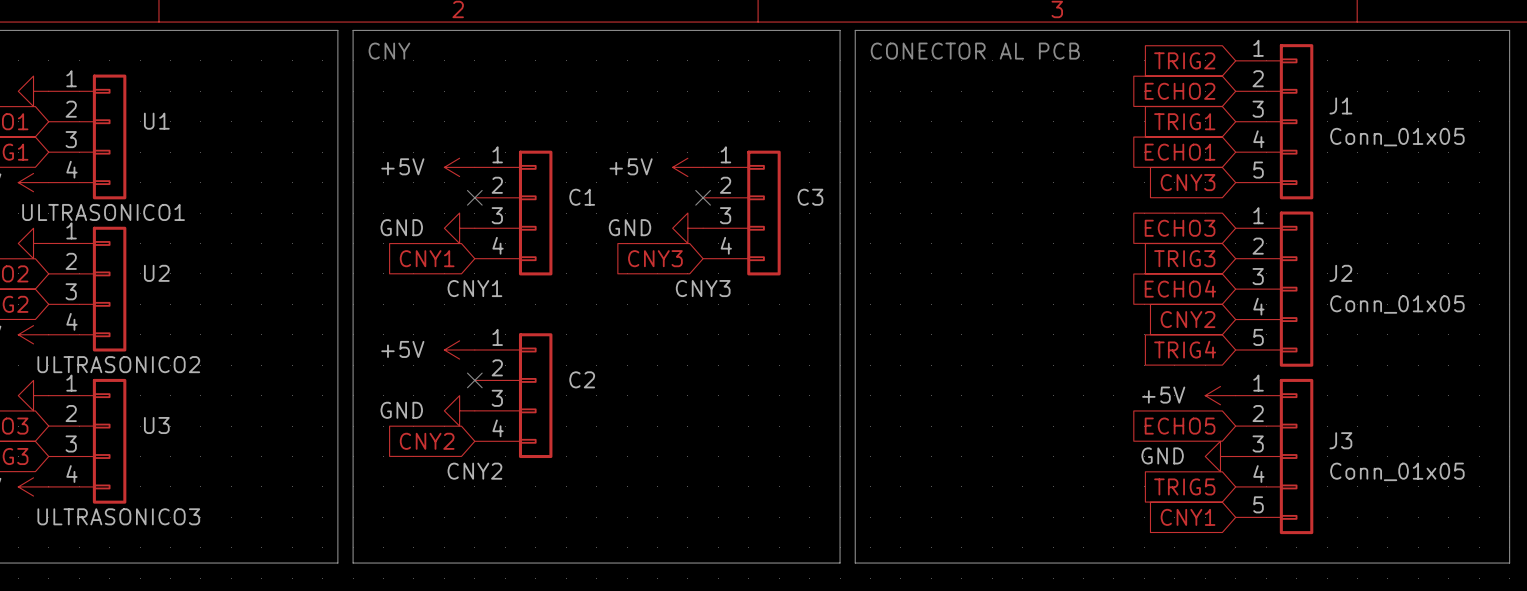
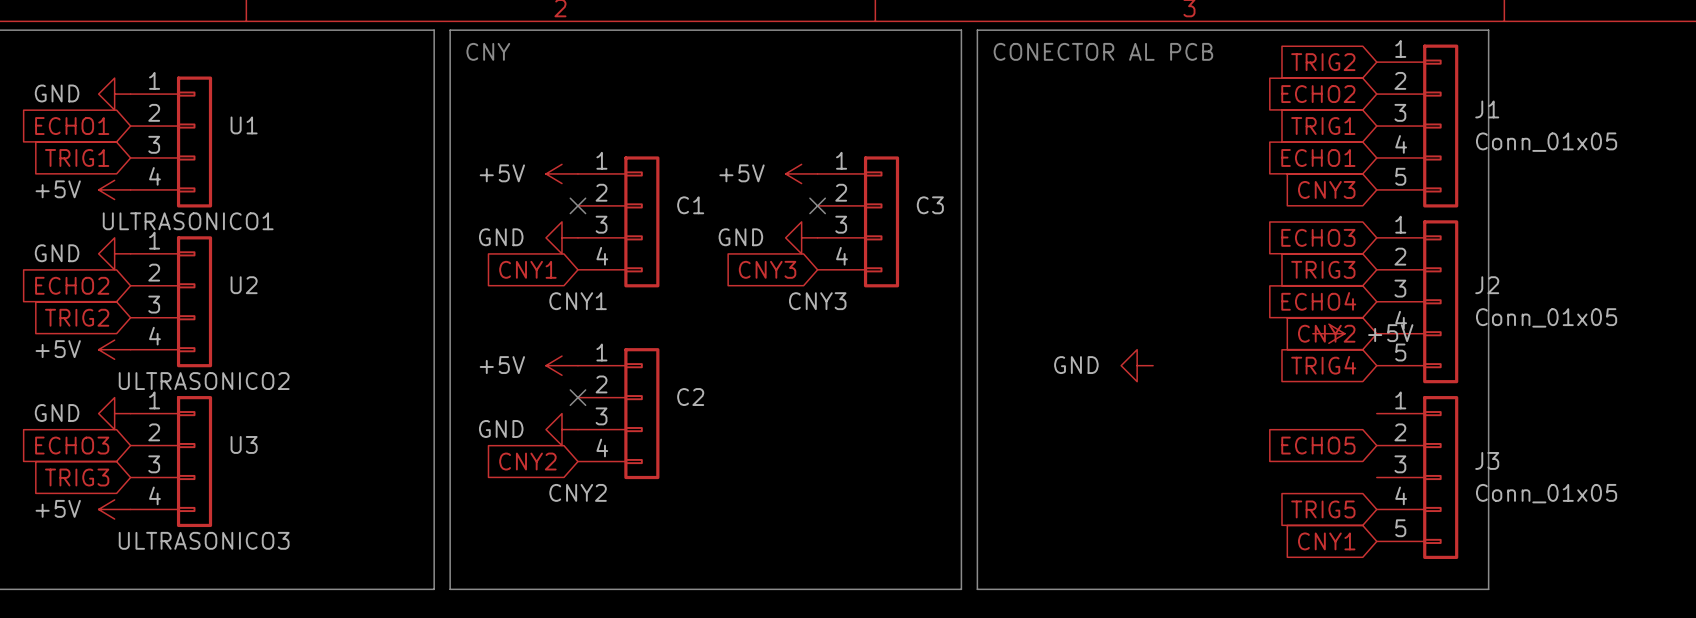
line: (1342, 30) (1509, 30) (1509, 563) (1342, 563) -> (1488, 30) (1488, 589)
power symbol rotation: 0° (1220, 395) -> 180° (1328, 333)
power symbol position: +5V (1220, 395) -> +5V (1328, 333)
power symbol position: GND (1220, 456) -> GND (1137, 365)

